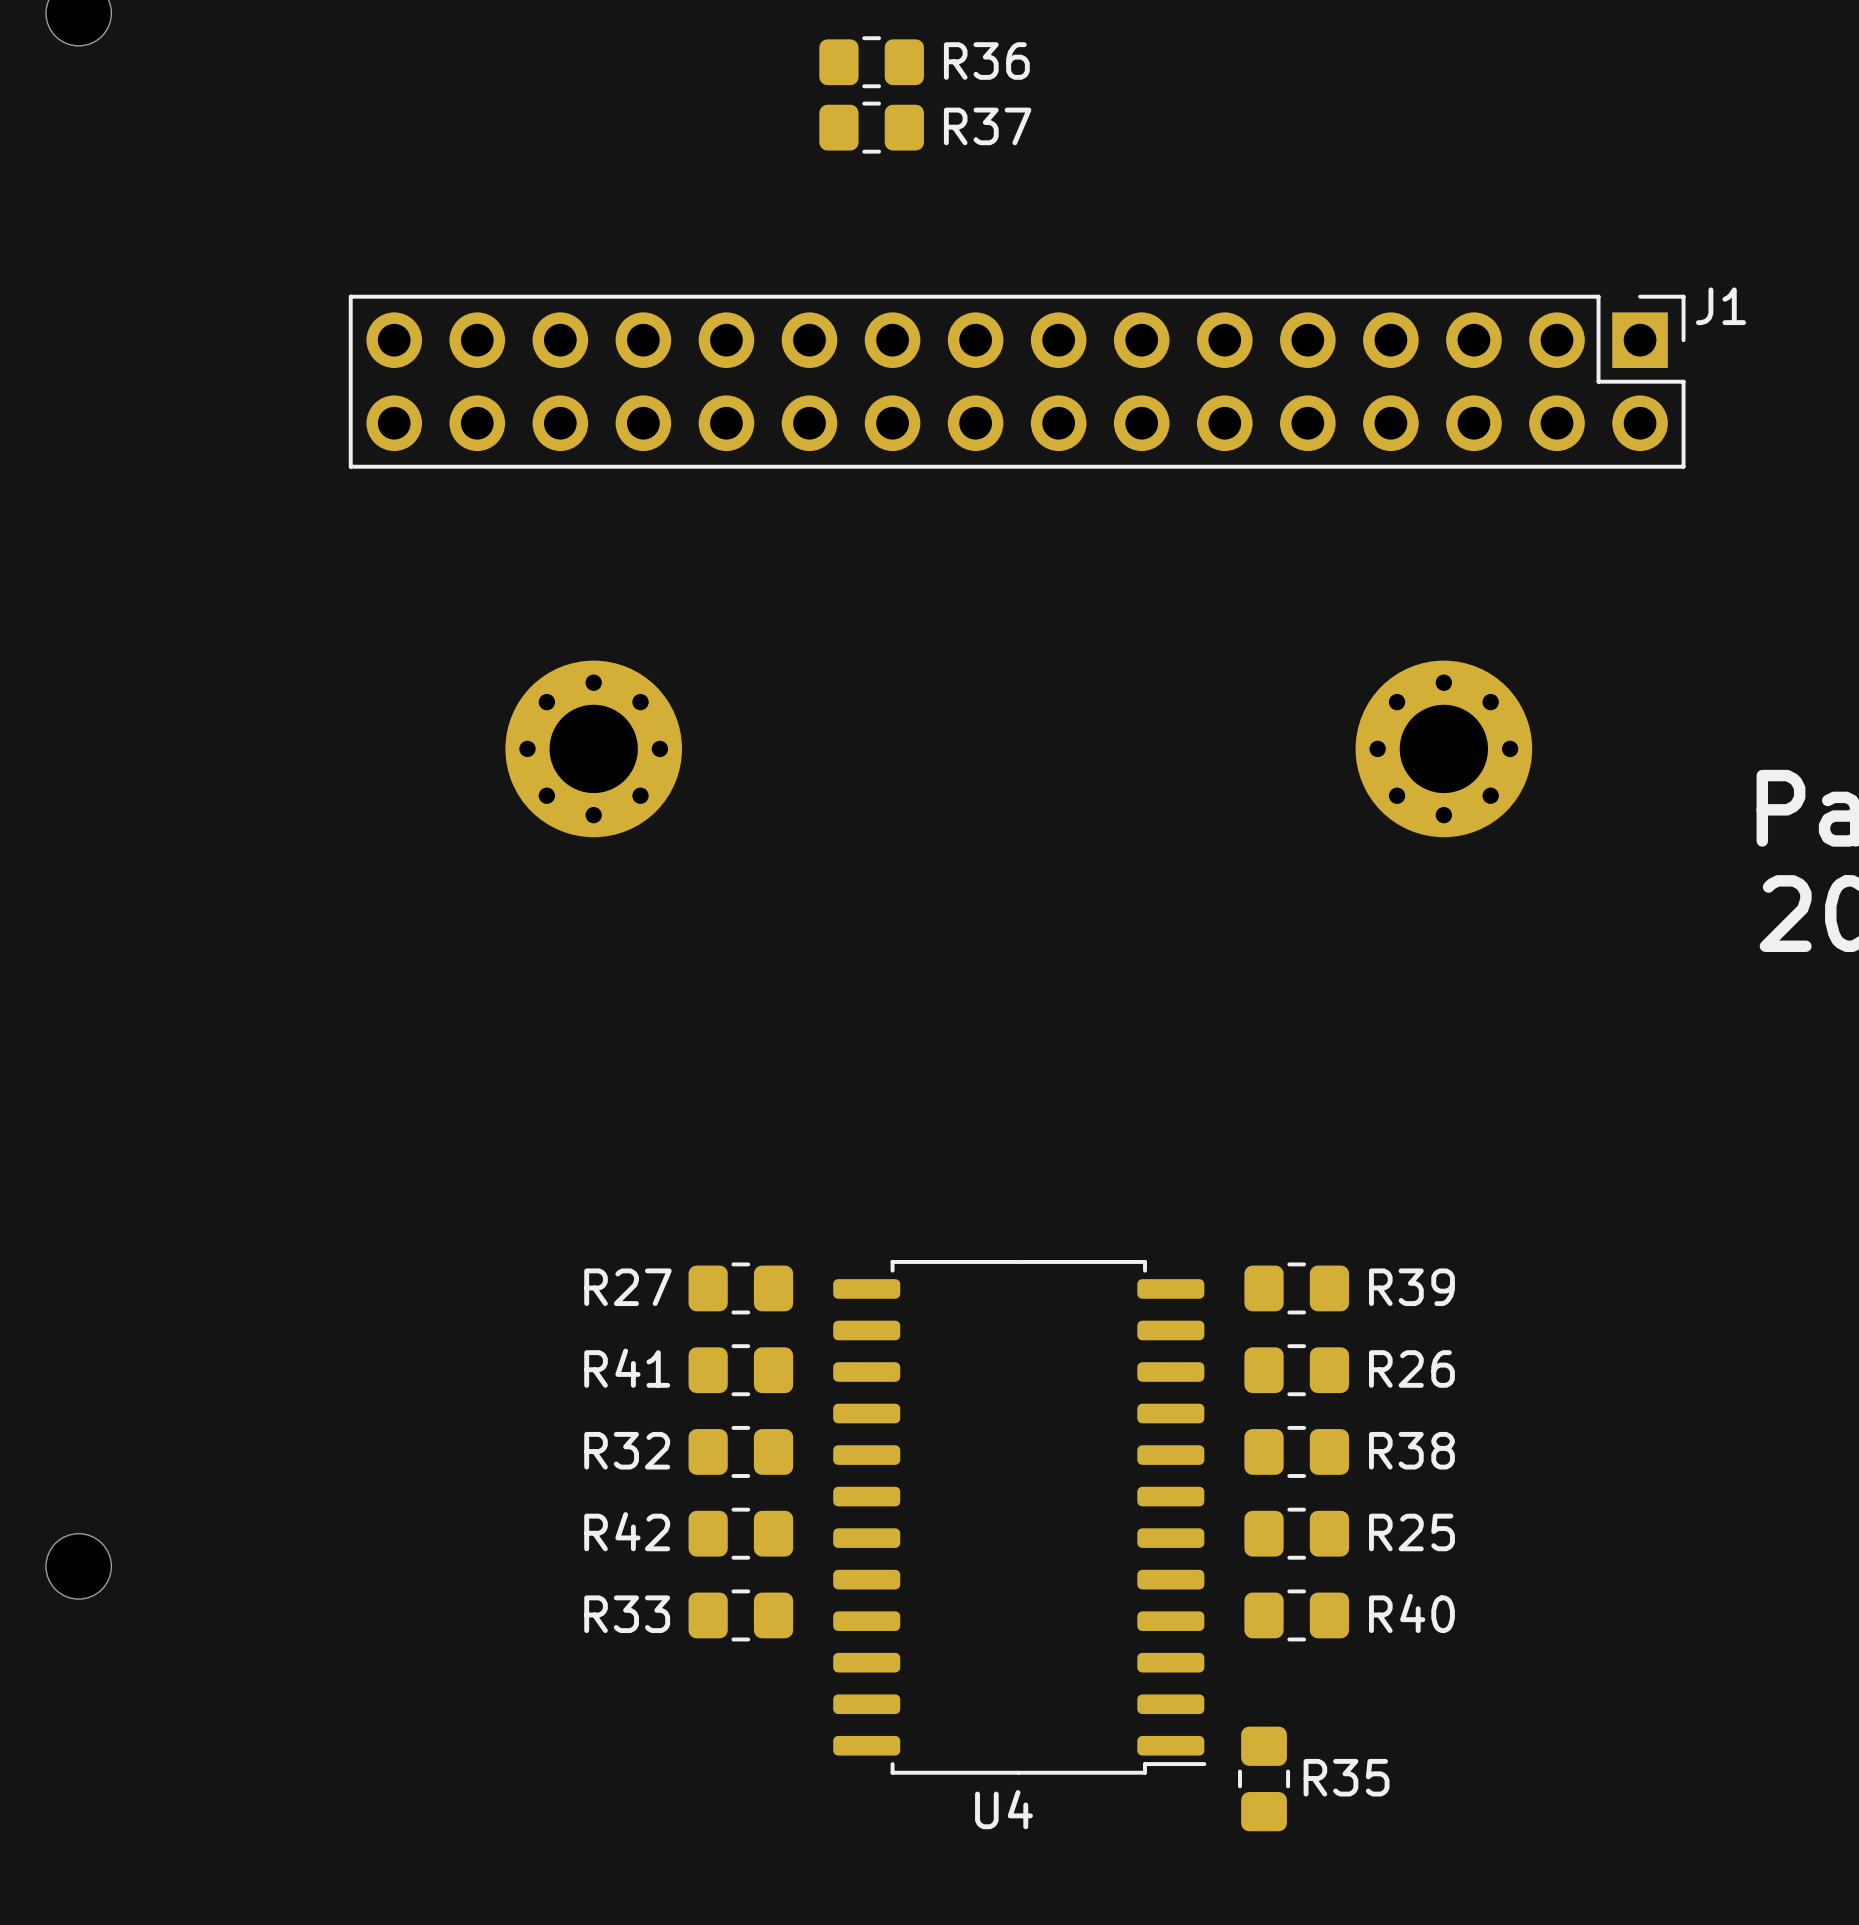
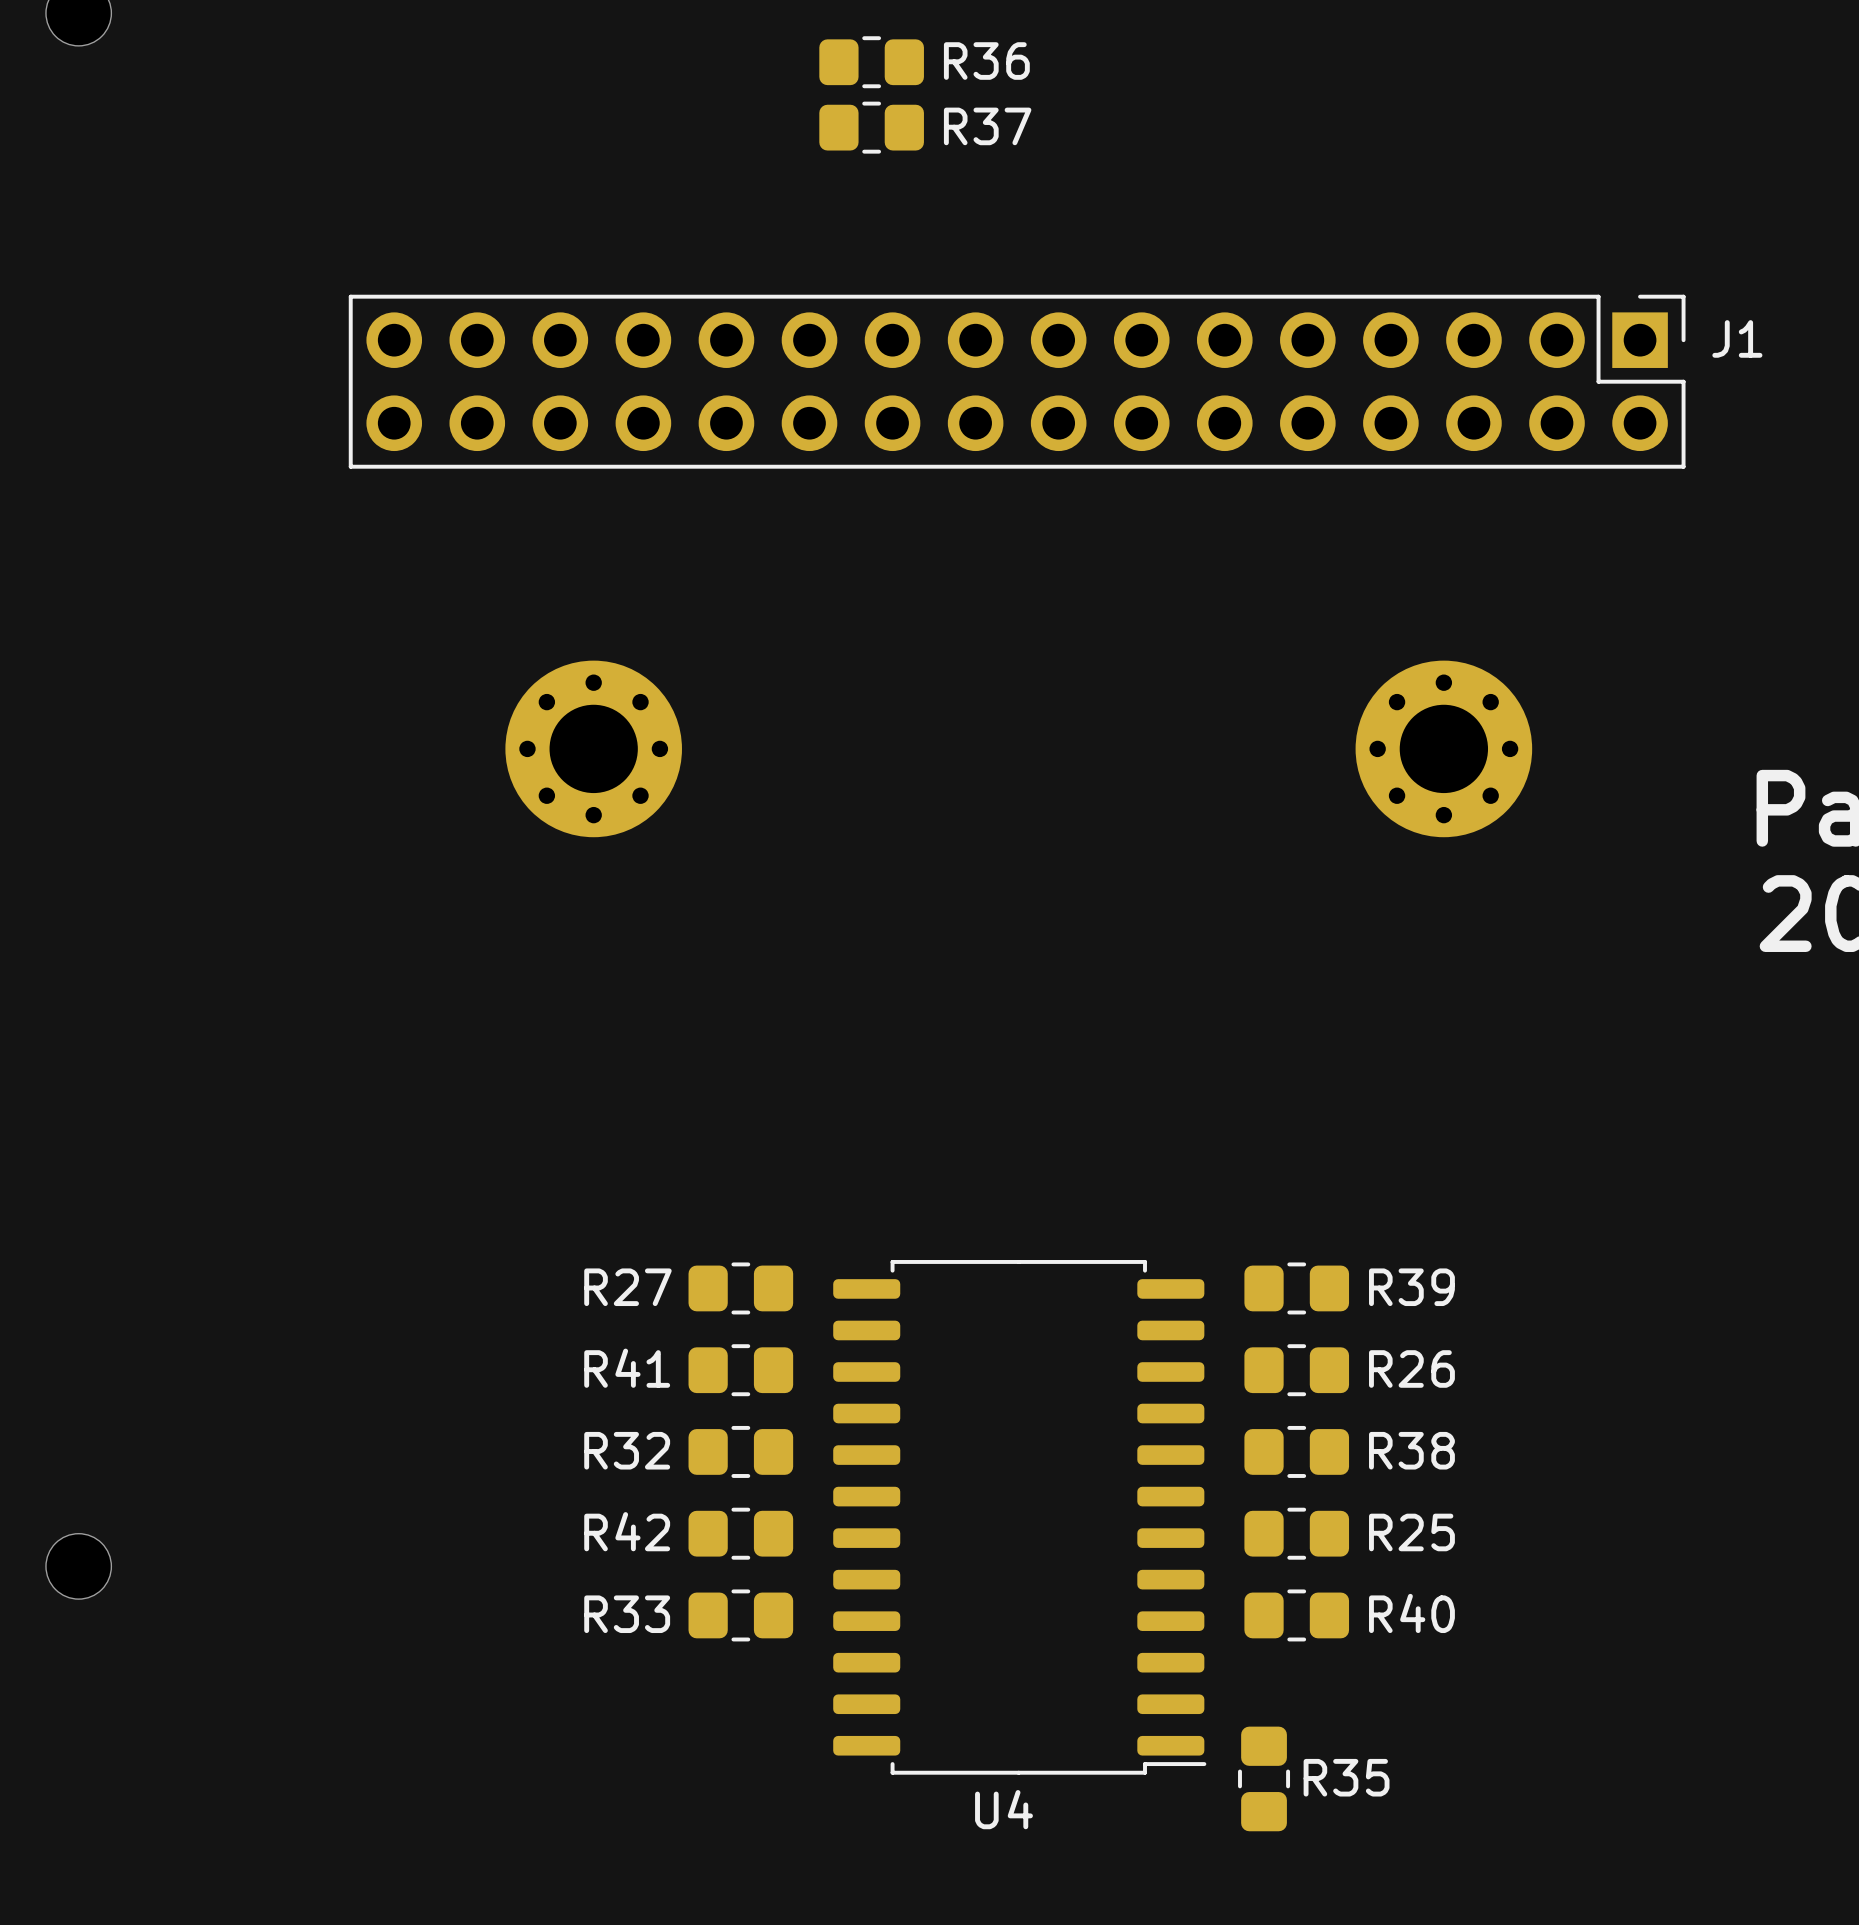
J1 name position: J1 (1721, 306) -> J1 (1737, 338)

